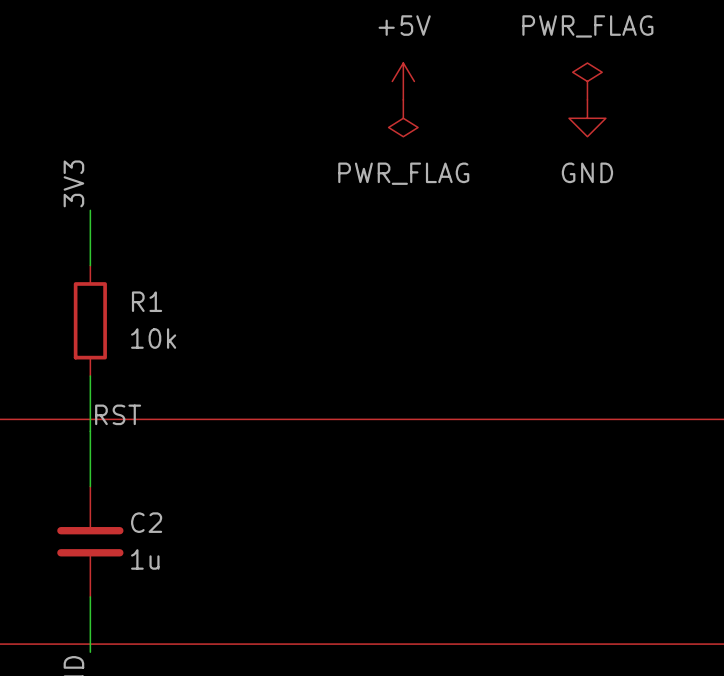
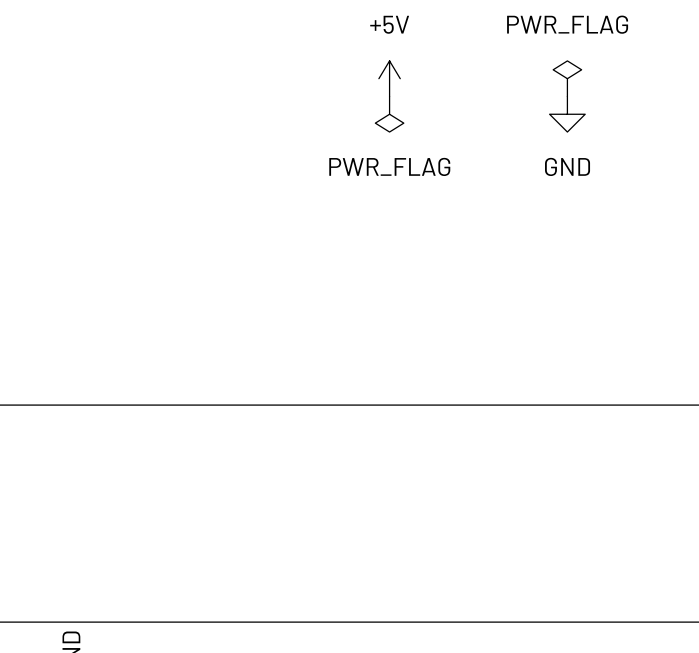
label: 3V3 (73, 183) -> none
wire: (90, 210) (90, 265) -> none
R1: 10k (90, 320) -> none
wire: (90, 376) (90, 486) -> none
label: RST (118, 414) -> none
C2: 1u (90, 541) -> none
wire: (90, 596) (90, 652) -> none

